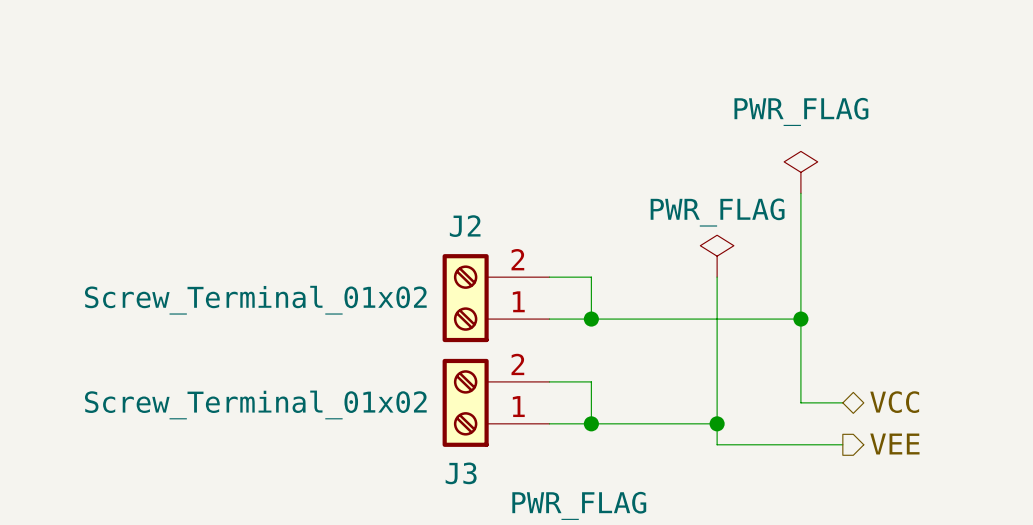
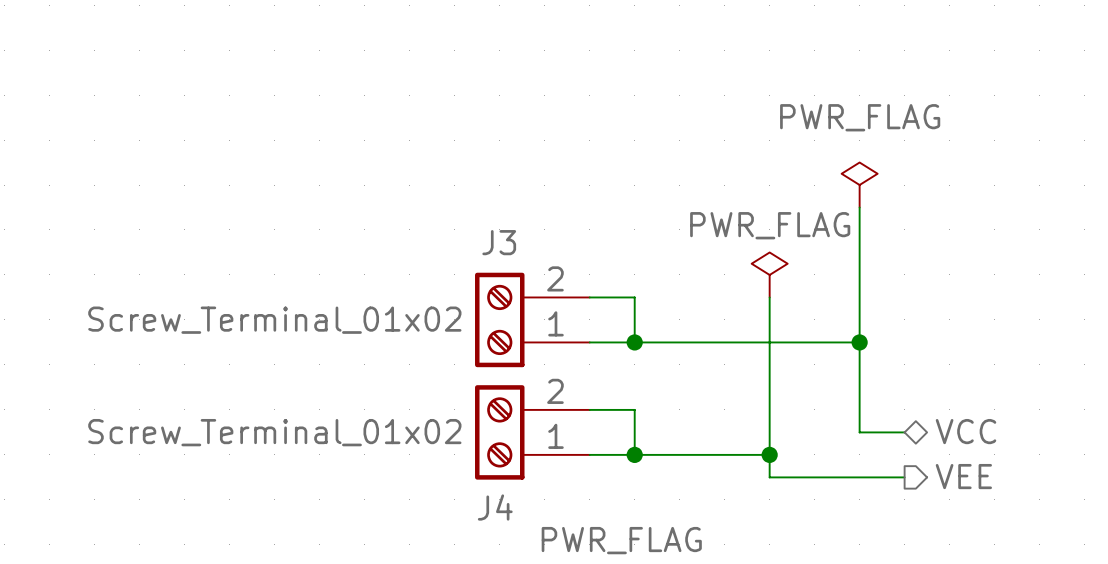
J2 name: J2 (465, 226) -> J3 (499, 242)
J3 name: J3 (461, 473) -> J4 (495, 507)

